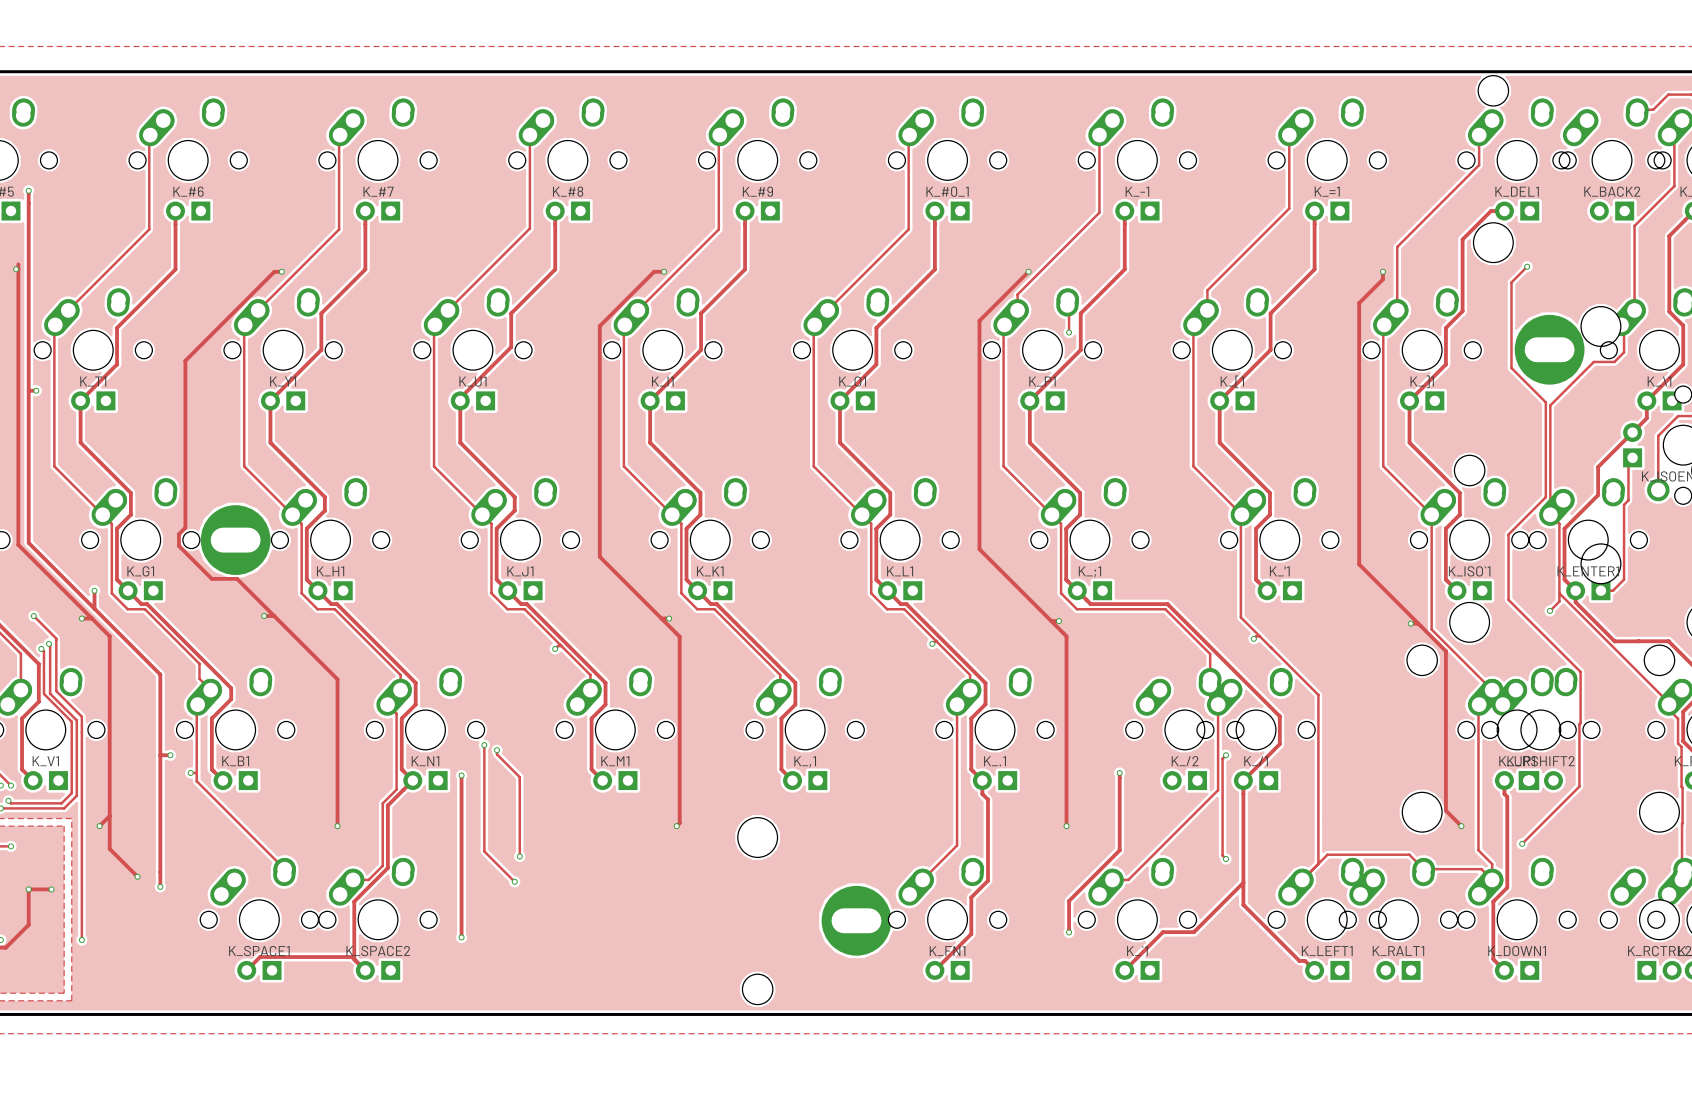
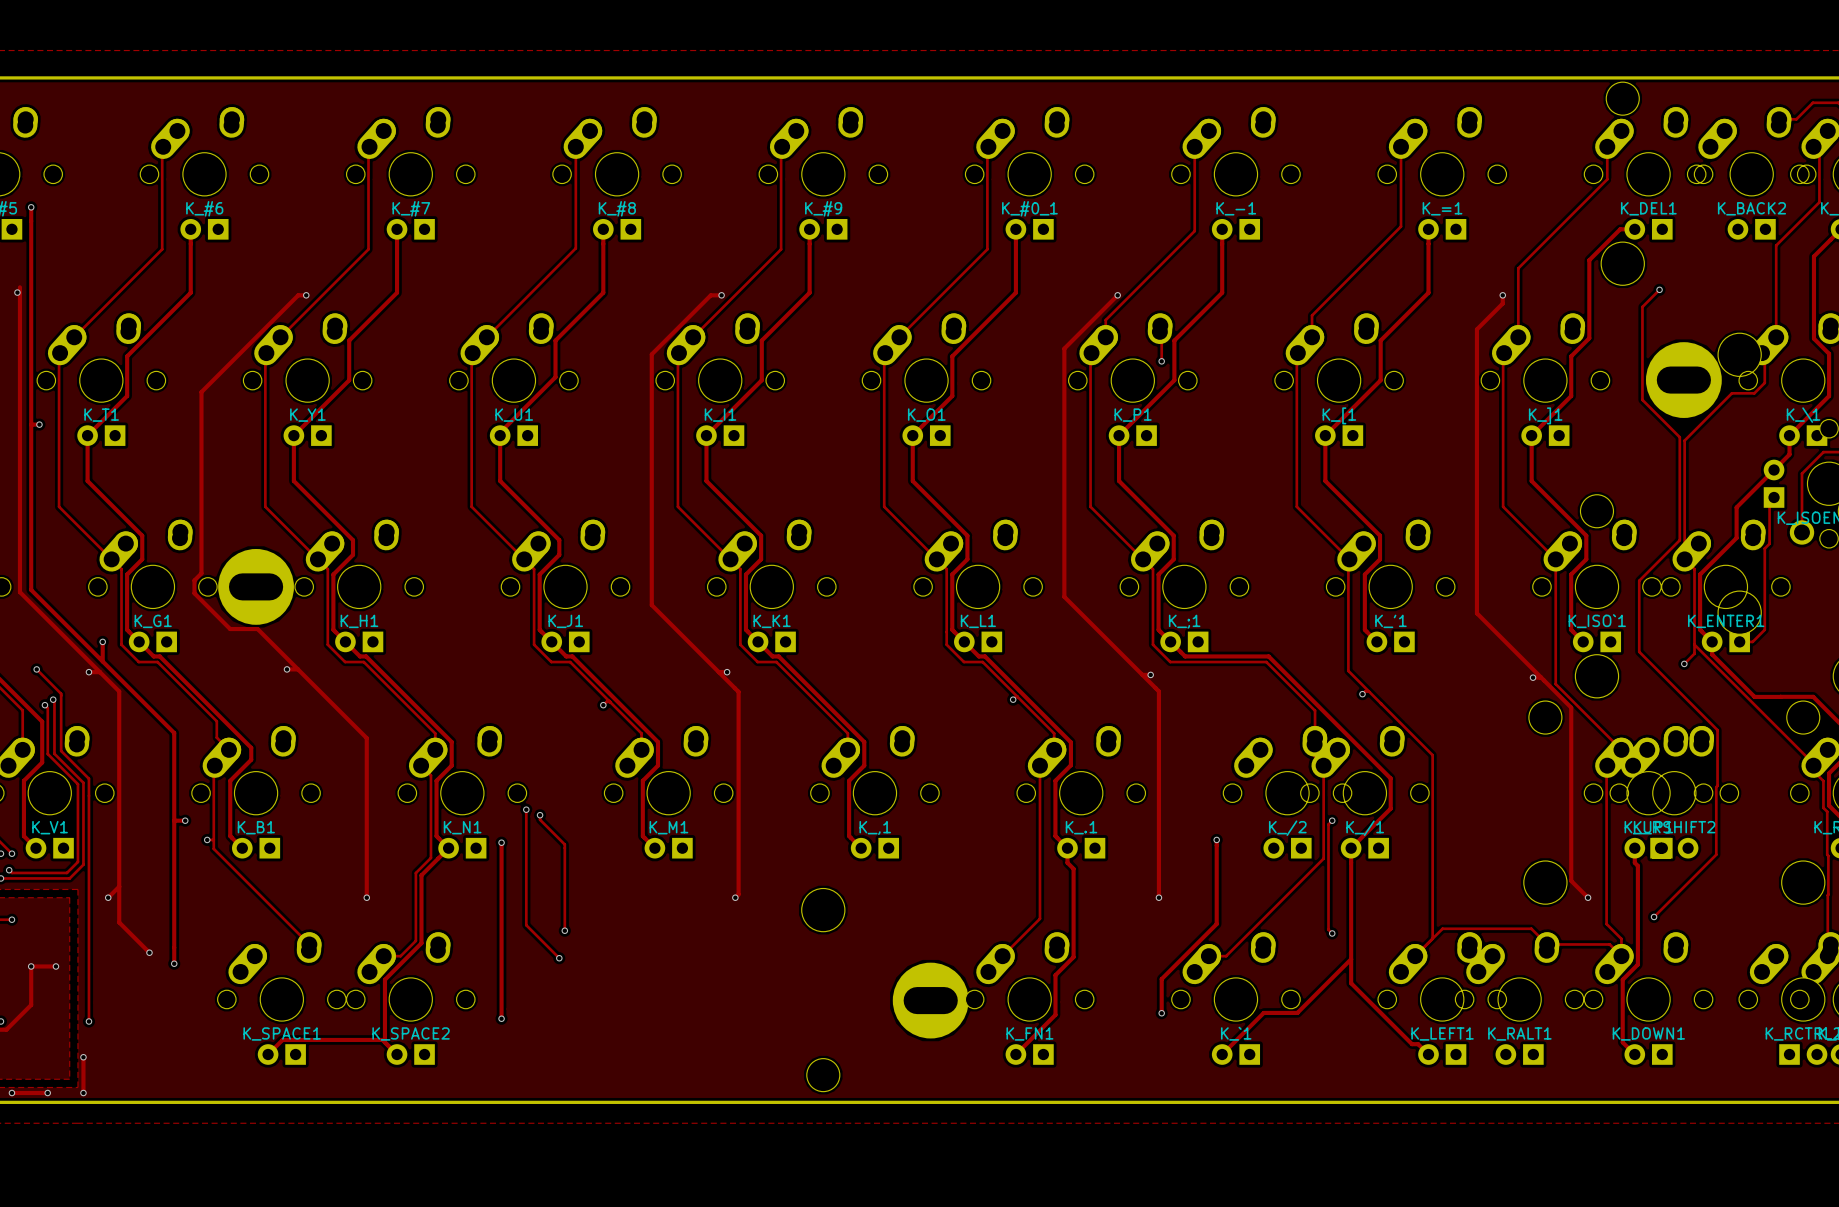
track: none -> (83, 1057) (83, 1093)
via: none -> (83, 1057)
track: none -> (11, 1093) (47, 1093)
via: none -> (11, 1093)
via: none -> (47, 1093)
via: none -> (83, 1093)

